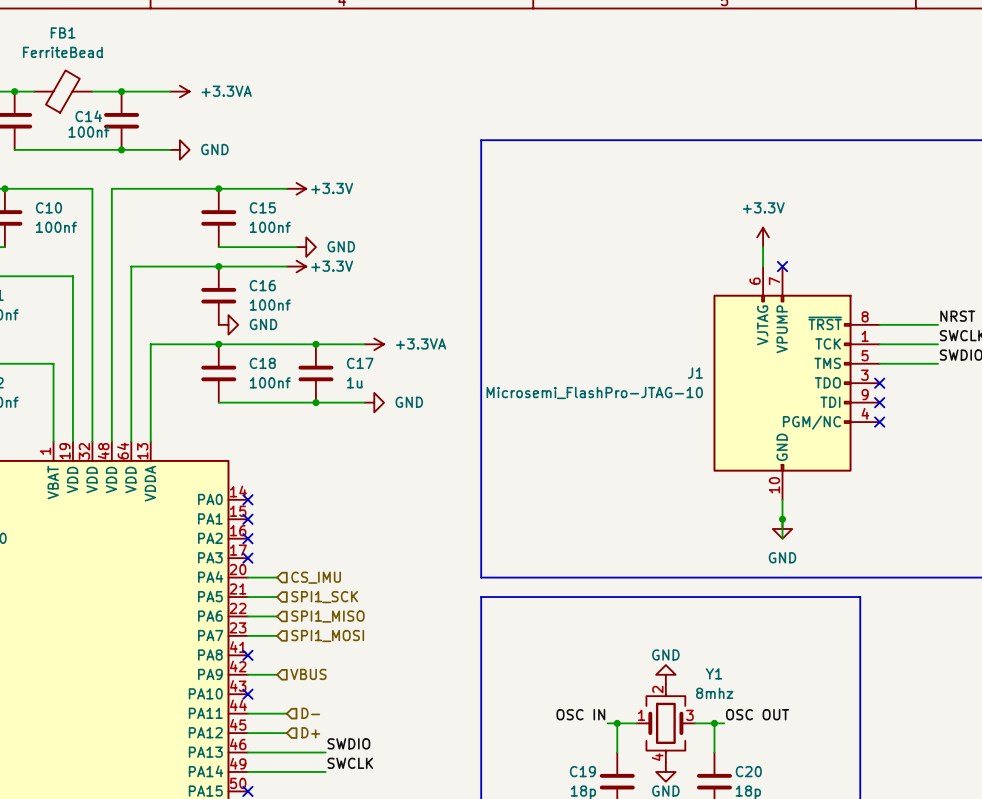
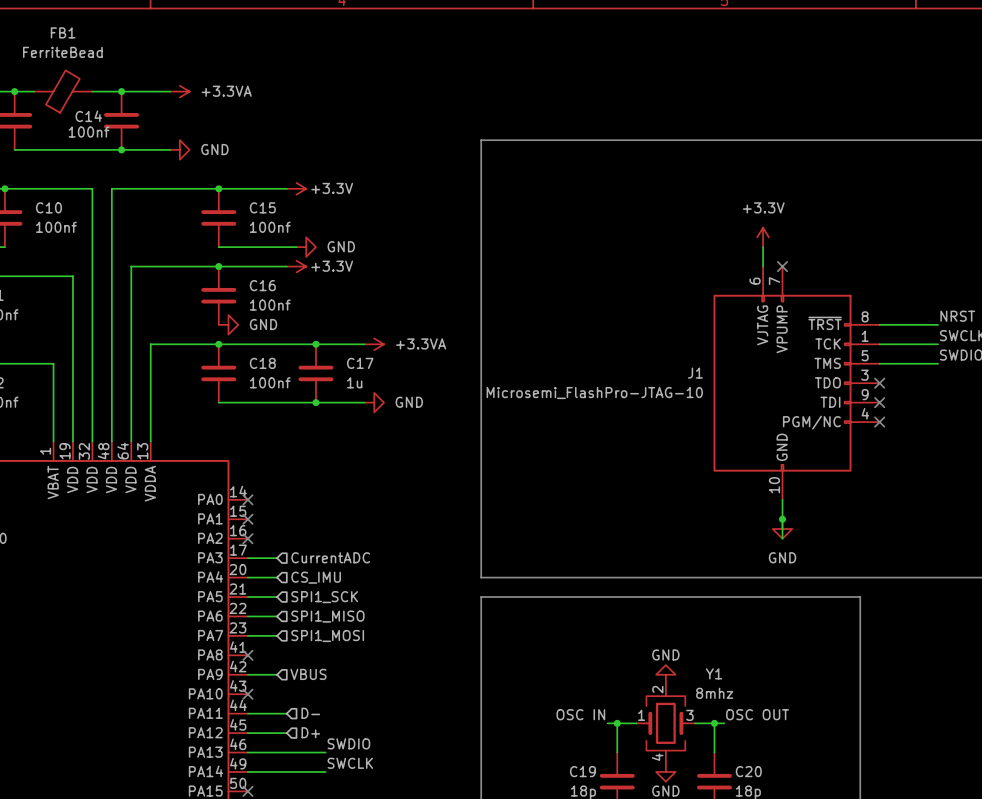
hierarchical label: none -> CurrentADC (330, 557)
wire: none -> (247, 558) (277, 558)
no-connect mark: (247, 558) -> none

